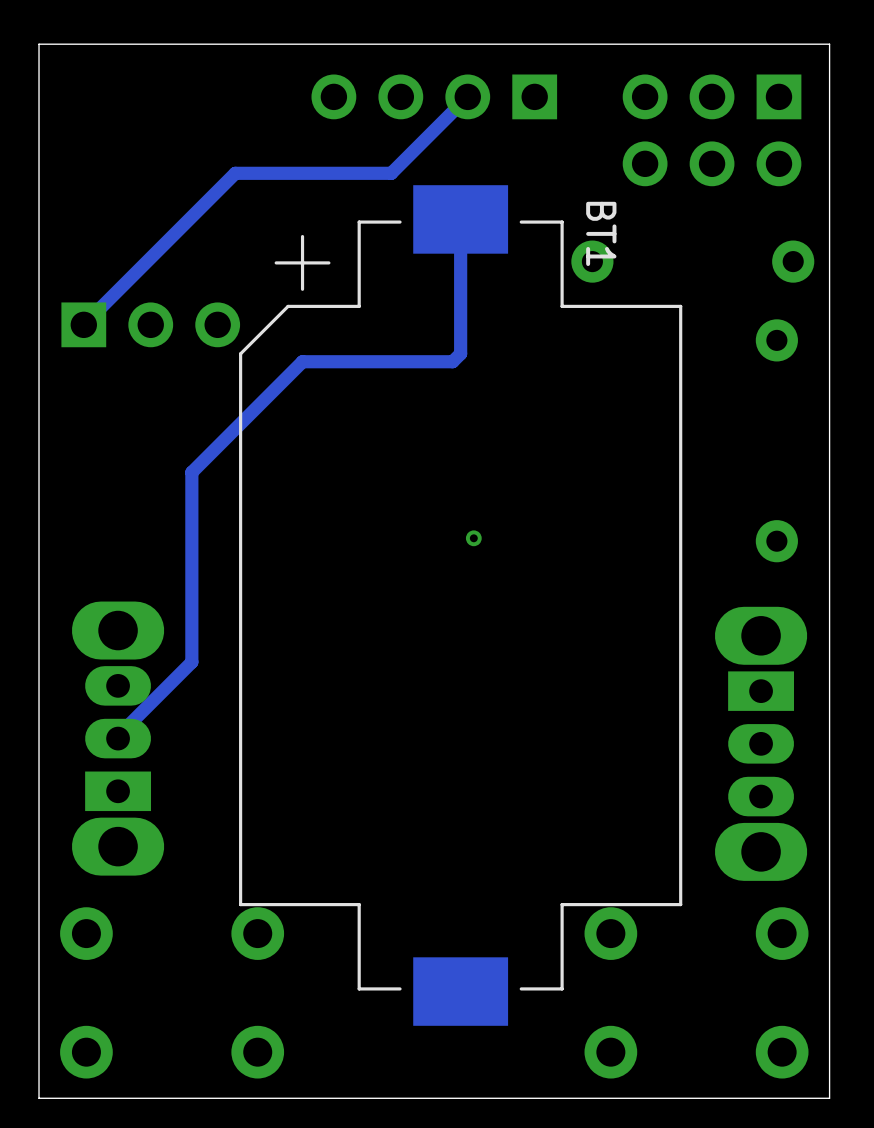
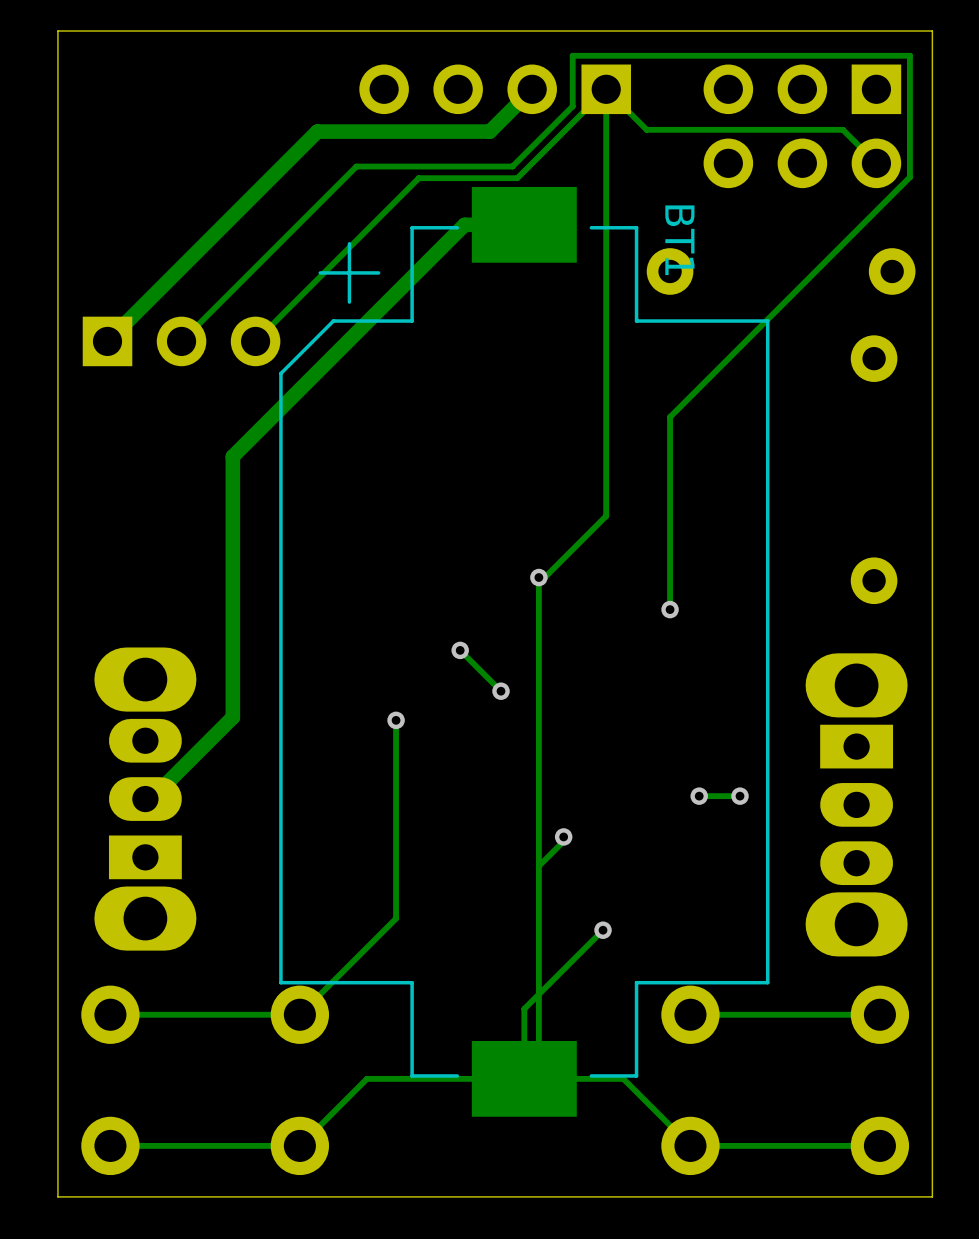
track: none -> (606, 89) (517, 178) (418, 178) (255, 341)
track: none -> (606, 89) (606, 516) (544, 577) (538, 577) (538, 1064) (524, 1078) (524, 1008) (603, 930)
track: none -> (606, 89) (646, 129) (842, 129) (876, 163)
track: (429, 135) (391, 173) (235, 173) -> (489, 131) (317, 131) (275, 173)
track: (460, 219) (460, 353) (452, 361) (302, 361) (191, 472) (191, 662) (115, 738) -> (524, 224) (464, 224) (232, 456) (232, 717) (151, 799) (145, 799)
track: none -> (181, 341) (356, 166) (512, 166) (572, 106) (572, 55) (909, 55) (909, 177) (670, 417) (670, 609)
via: none -> (670, 609)
track: none -> (460, 650) (501, 691)
via: none -> (460, 650)
via: none -> (501, 691)
track: none -> (396, 720) (396, 918) (299, 1014) (110, 1014)
via: none -> (396, 720)
via: none -> (699, 796)
track: none -> (740, 796) (699, 796)
via: none -> (740, 796)
track: none -> (563, 836) (563, 841) (538, 866)
via: none -> (563, 836)
via: none -> (603, 930)
track: none -> (879, 1014) (690, 1014)
track: none -> (879, 1145) (690, 1145) (623, 1078) (366, 1078) (299, 1145) (110, 1145)

